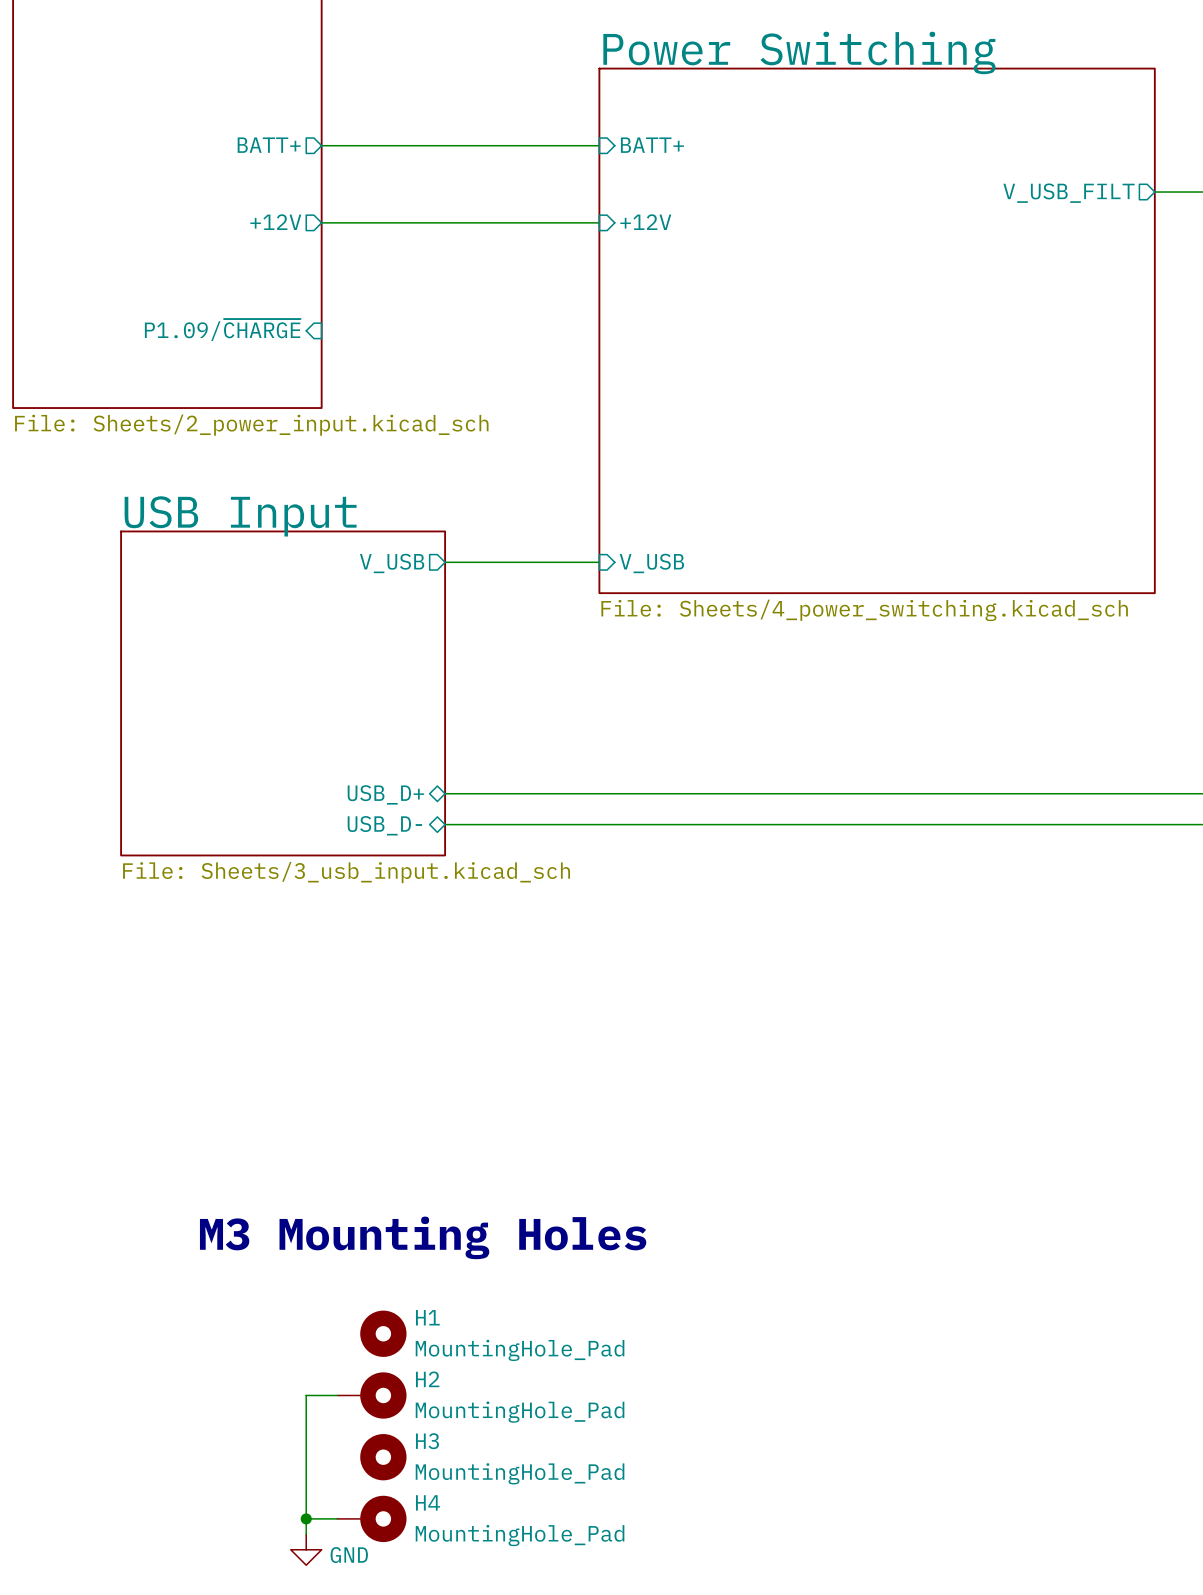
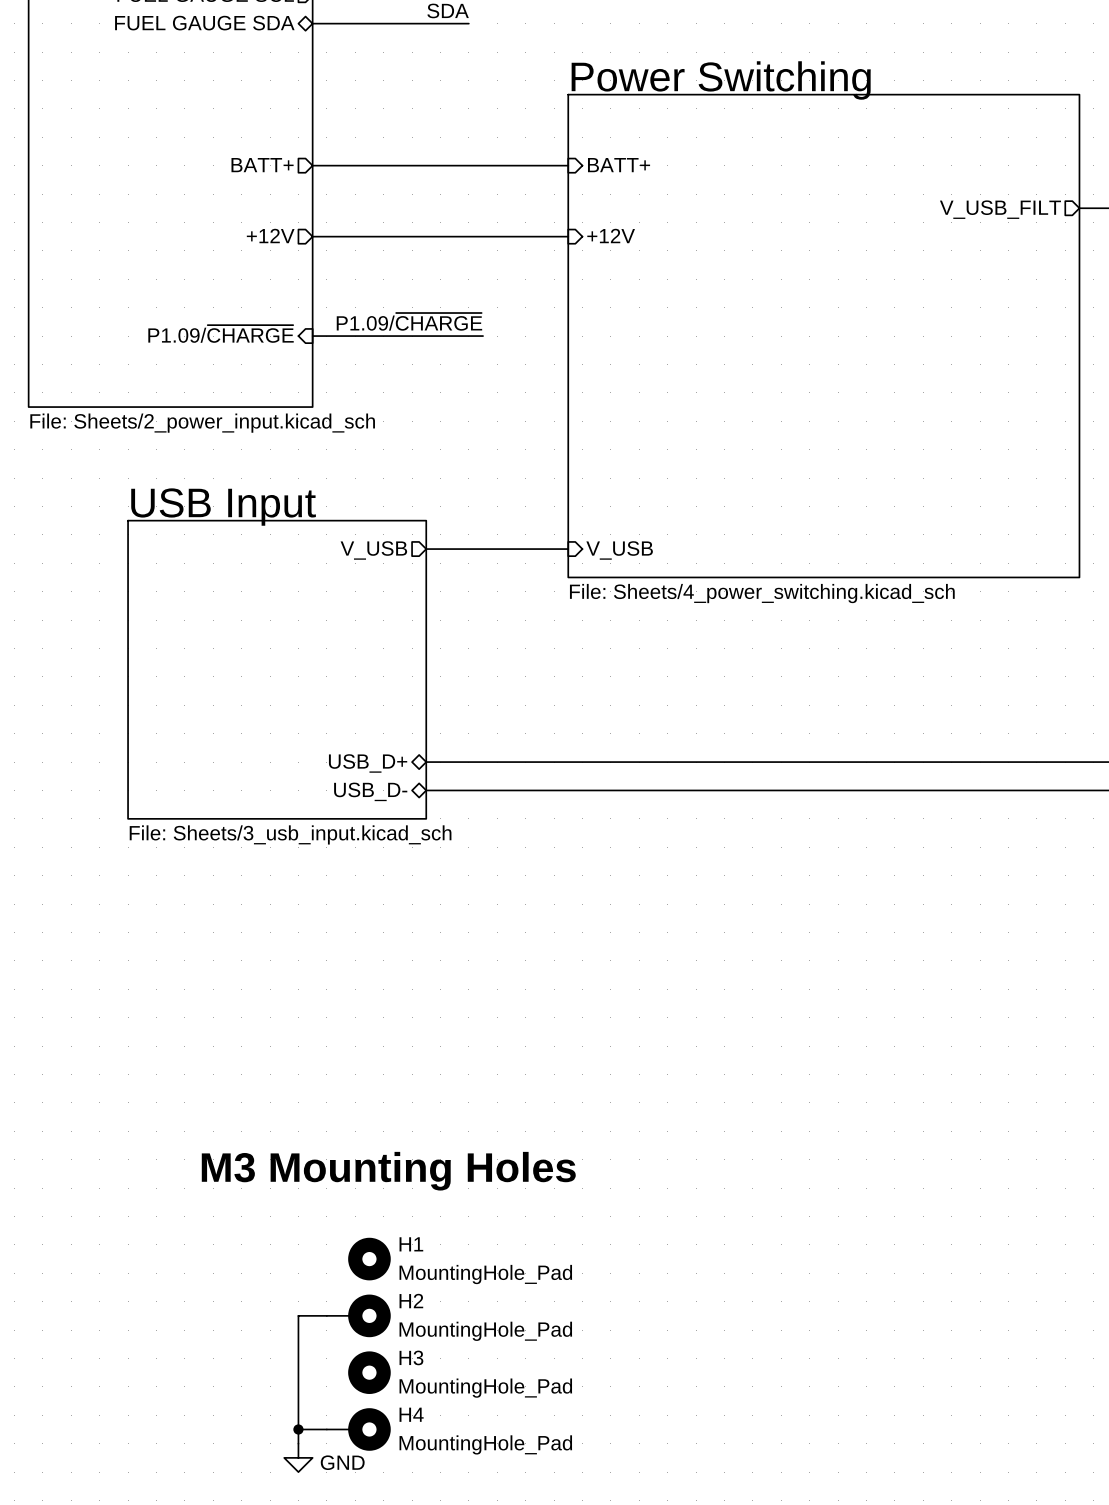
label: none -> P1.09/~{CHARGE} (409, 321)
wire: none -> (312, 336) (483, 336)

